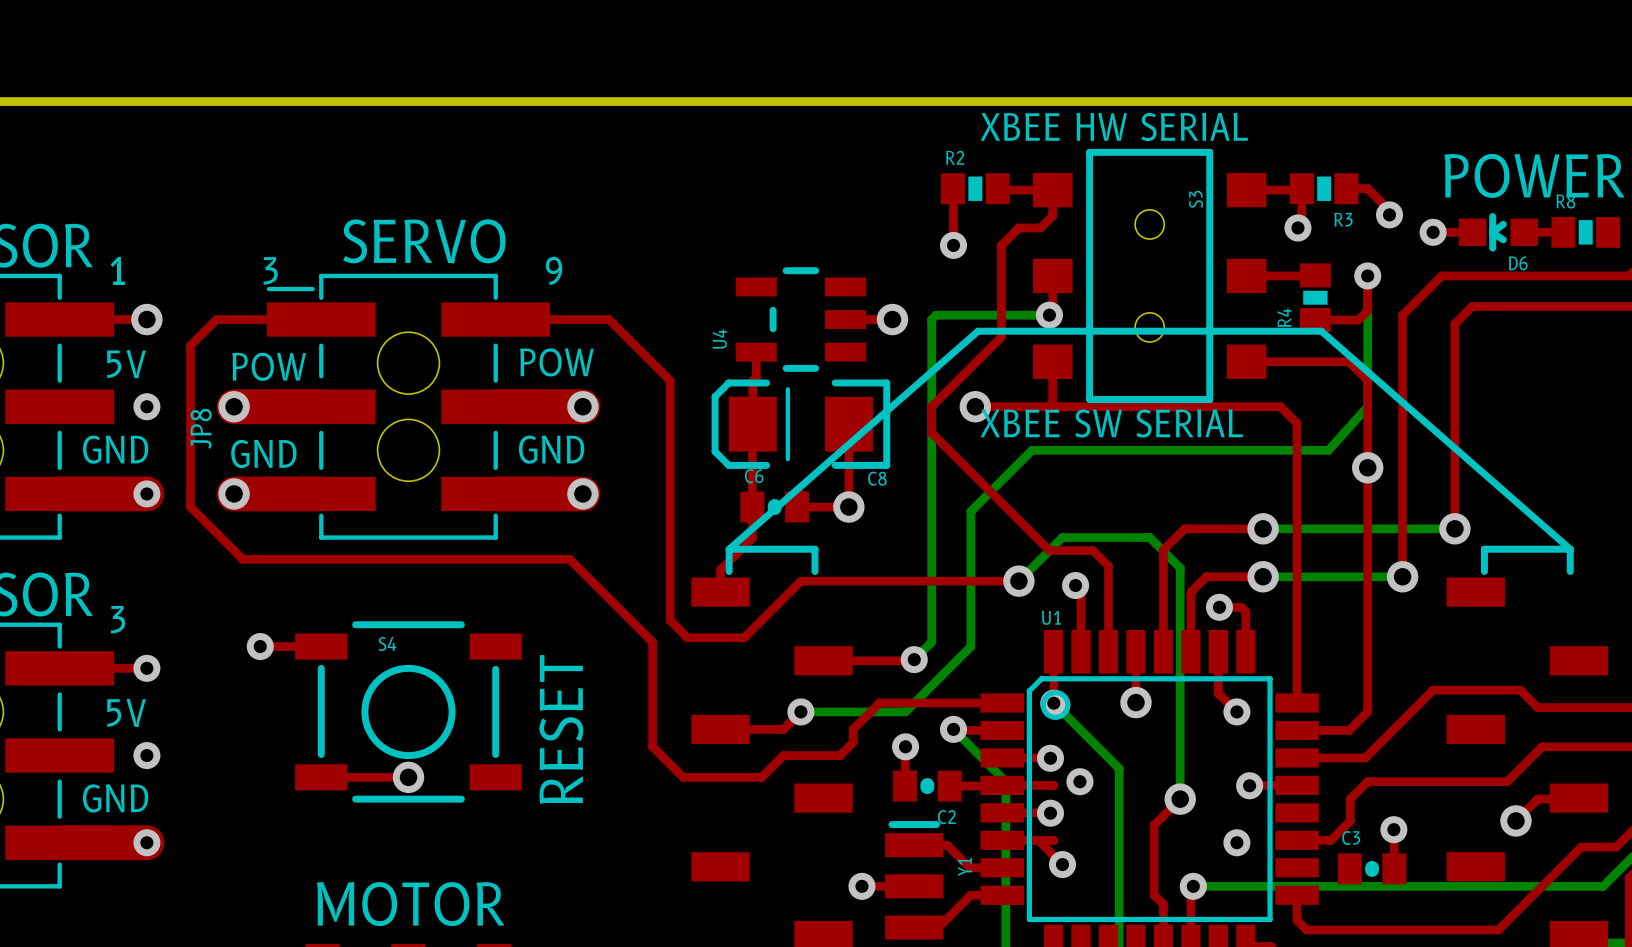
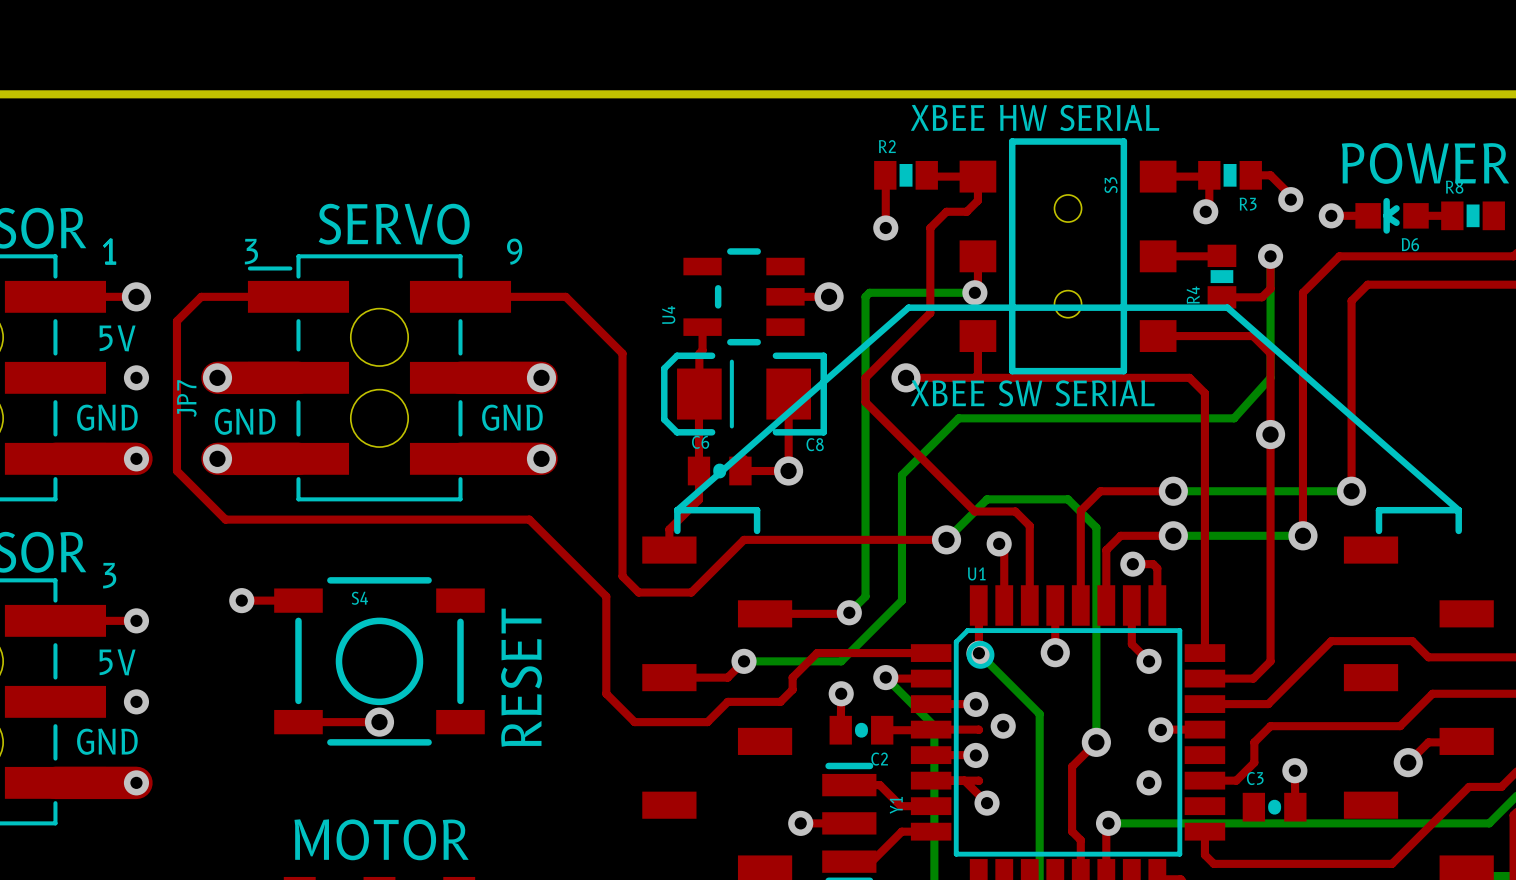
text: POW (556, 362) -> none
text: POW (269, 366) -> none
JP8 name: JP8 (201, 428) -> JP7 (186, 398)

